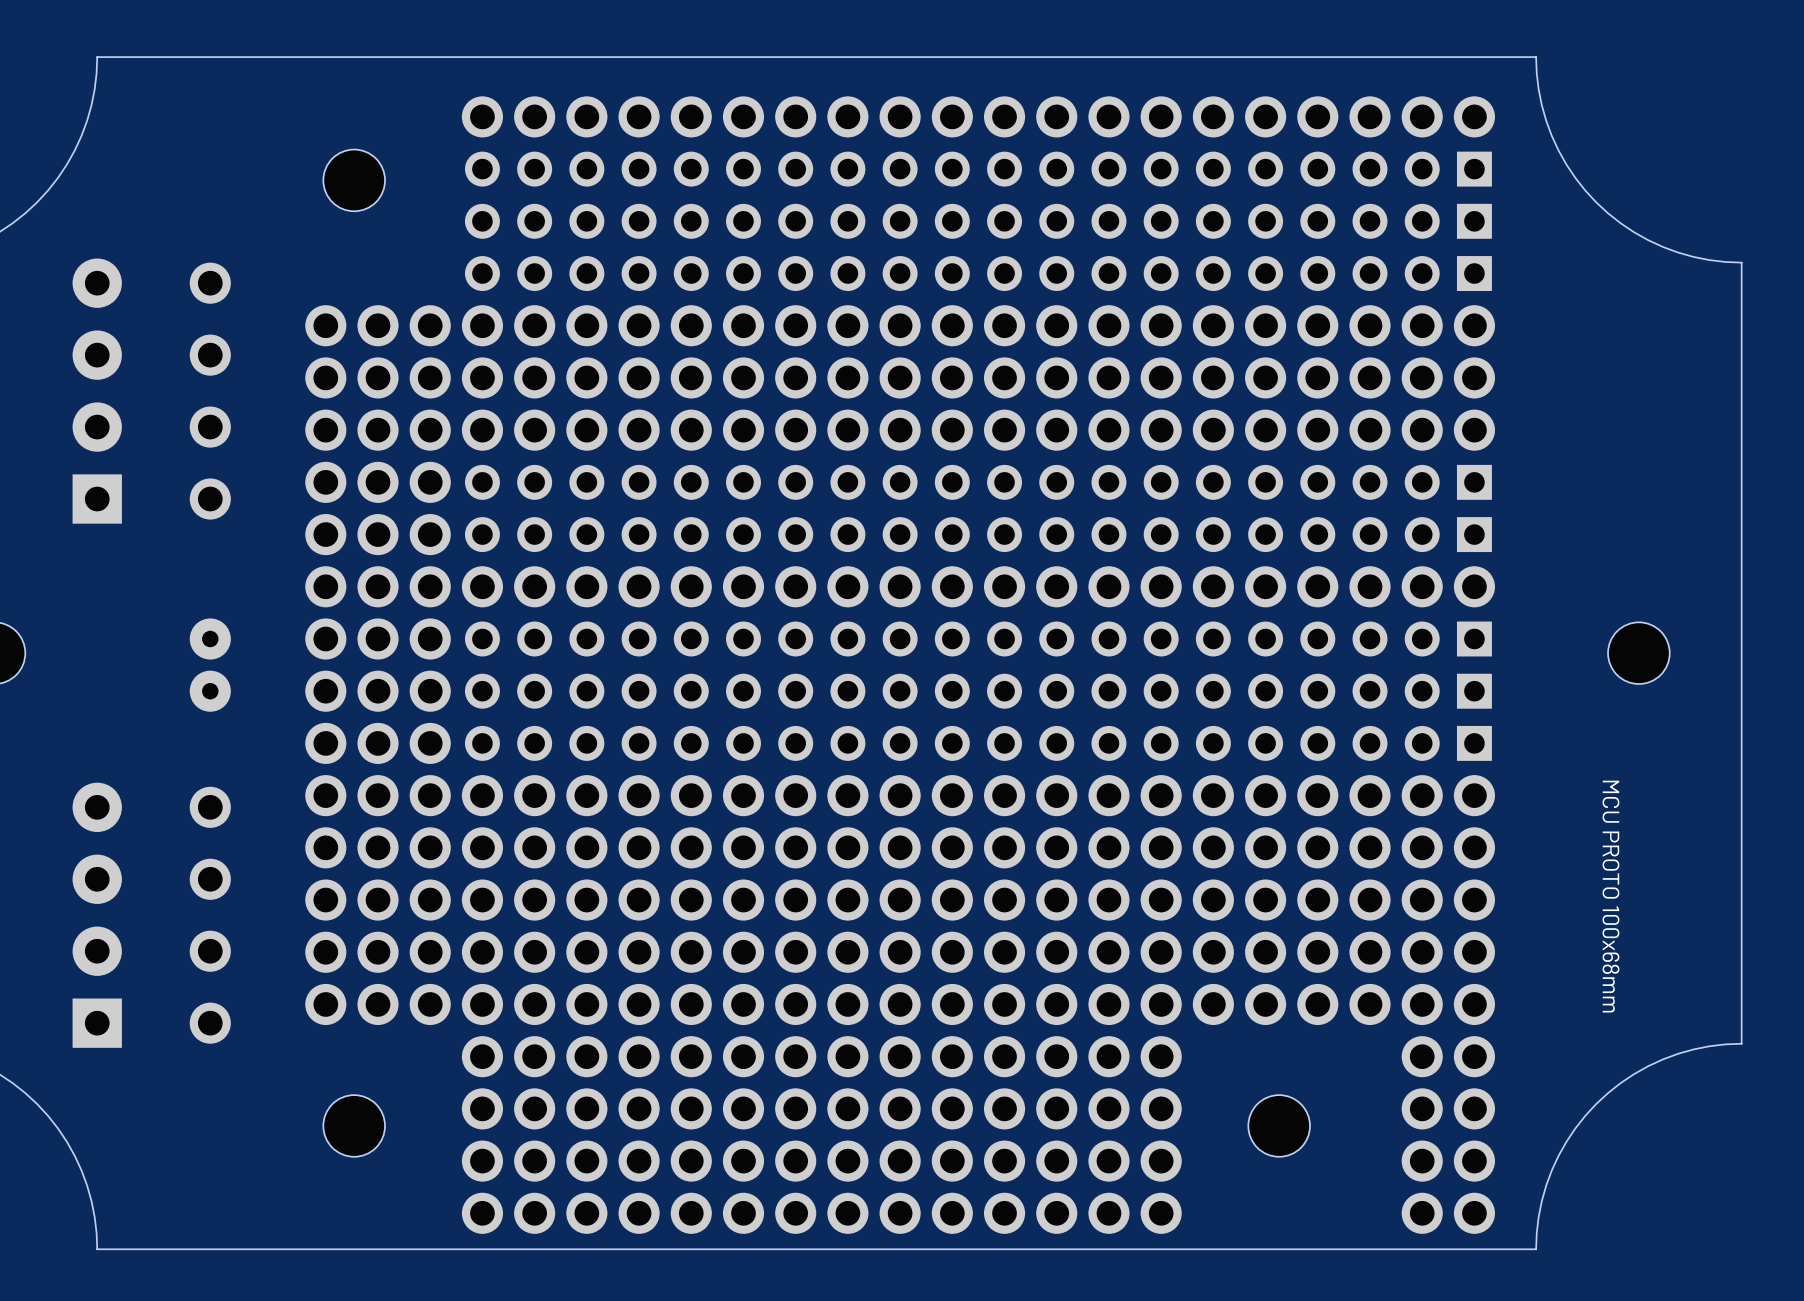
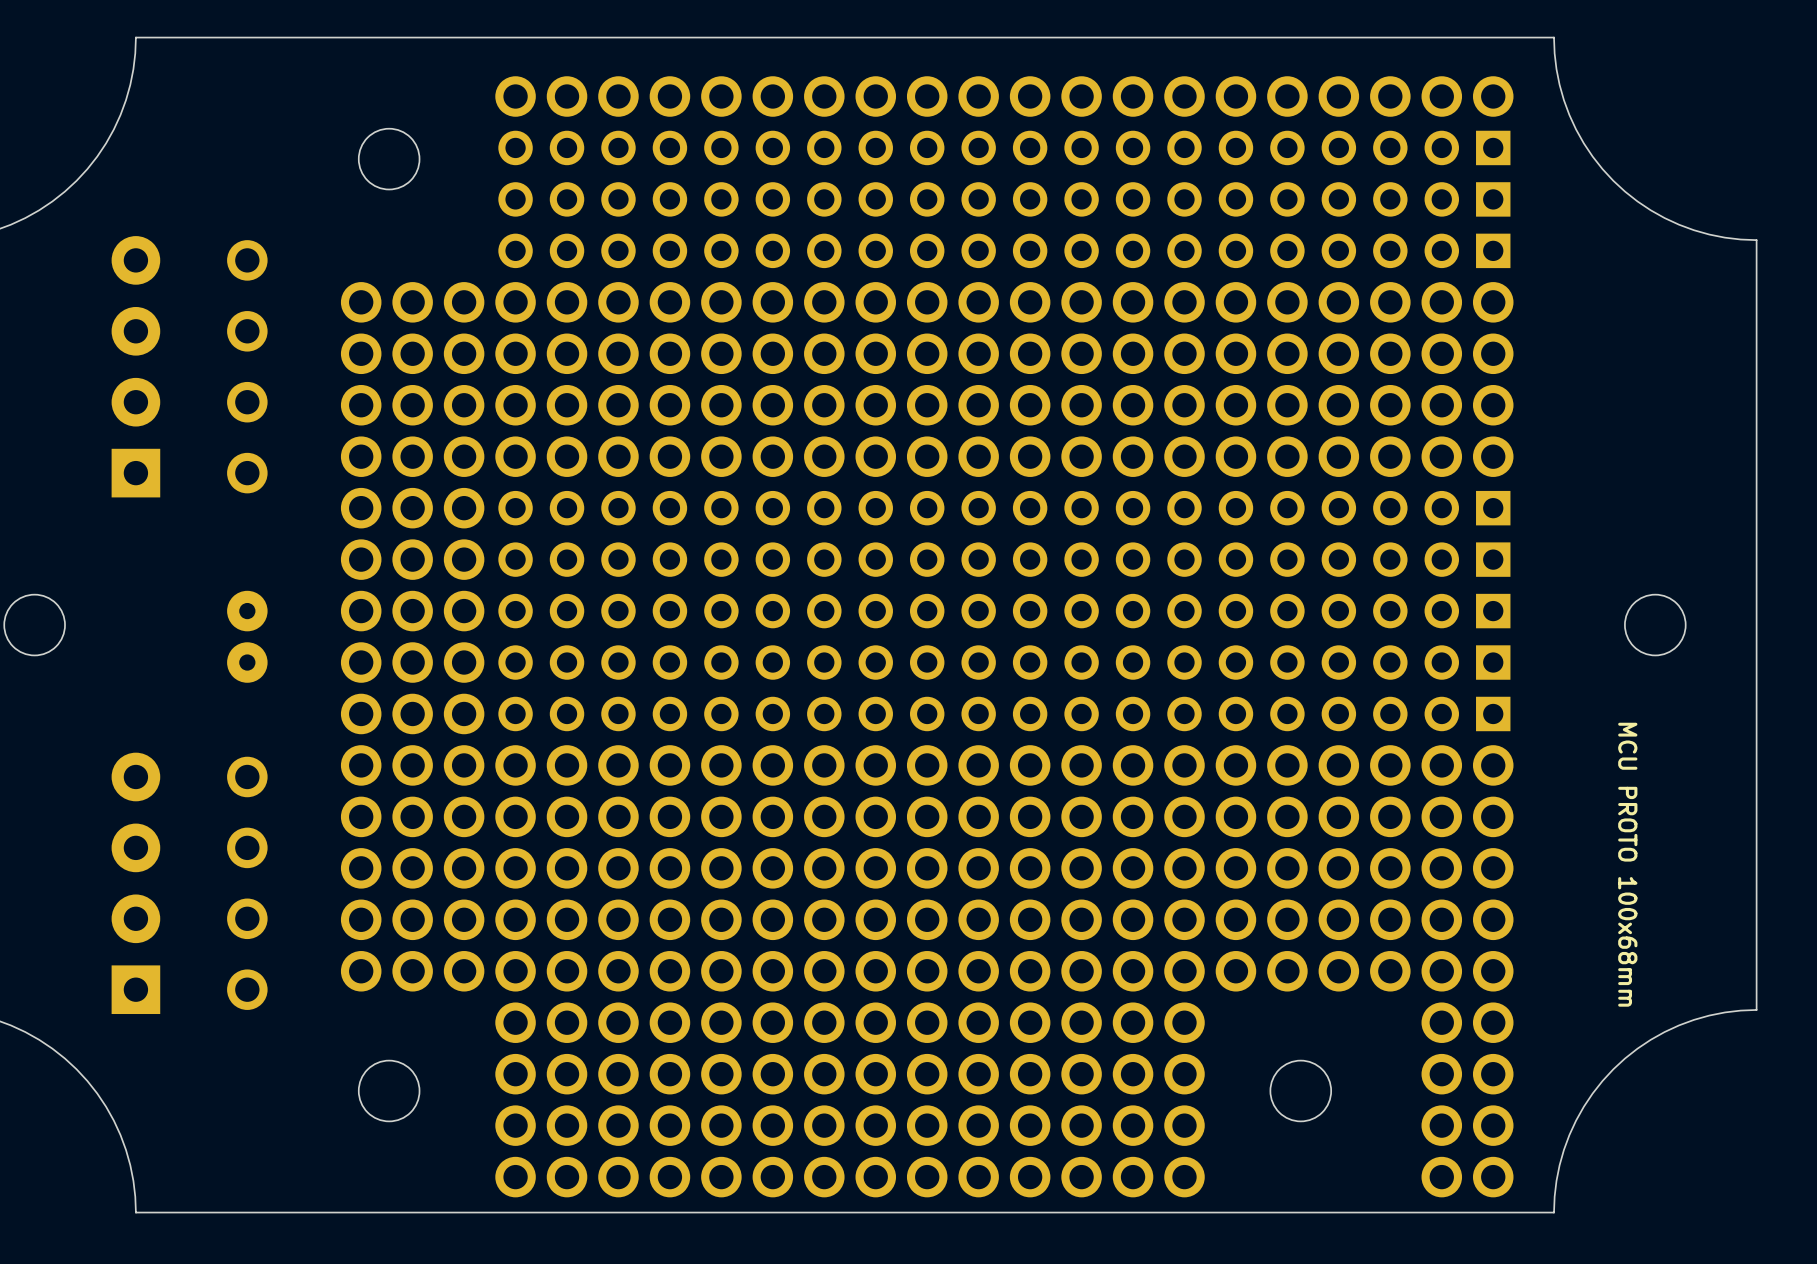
part: none -> (515, 456)
part: none -> (567, 456)
part: none -> (618, 456)
part: none -> (669, 456)
part: none -> (721, 456)
part: none -> (772, 456)
part: none -> (824, 456)
part: none -> (875, 456)
part: none -> (927, 456)
part: none -> (978, 456)
part position: (978, 482) -> (1004, 559)
part: none -> (1030, 456)
part: none -> (1081, 456)
part: none -> (1133, 456)
part: none -> (1184, 456)
part: none -> (1235, 456)
part: none -> (1287, 456)
part: none -> (1338, 456)
part: none -> (1390, 456)
part: none -> (1441, 456)
part: none -> (1493, 456)
part: (482, 586) -> none
part: (534, 586) -> none
part: (586, 586) -> none
part: (639, 586) -> none
part: (691, 586) -> none
part: (743, 586) -> none
part: (795, 586) -> none
part: (847, 586) -> none
part: (900, 586) -> none
part: (952, 586) -> none
part: (1004, 586) -> none
part: (1056, 586) -> none
part: (1108, 586) -> none
part: (1161, 586) -> none
part: (1213, 586) -> none
part: (1265, 586) -> none
part: (1317, 586) -> none
part: (1370, 586) -> none
part: (1422, 586) -> none
part: (1474, 586) -> none

